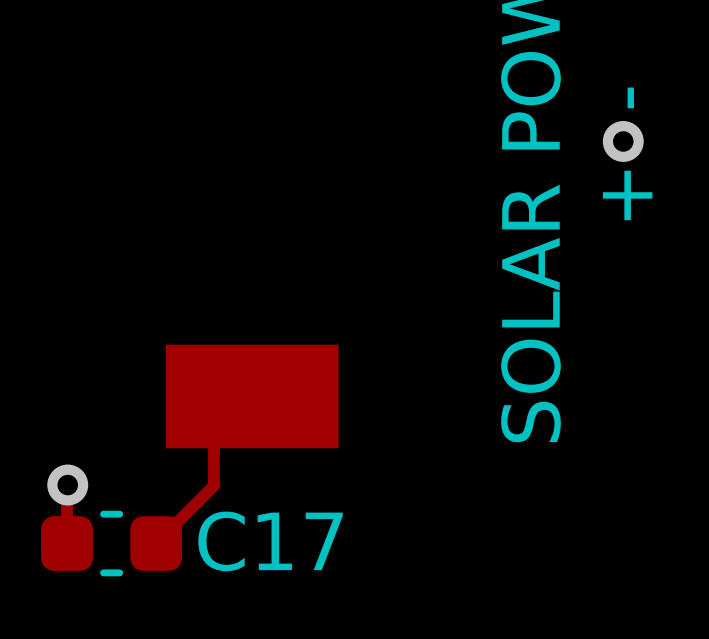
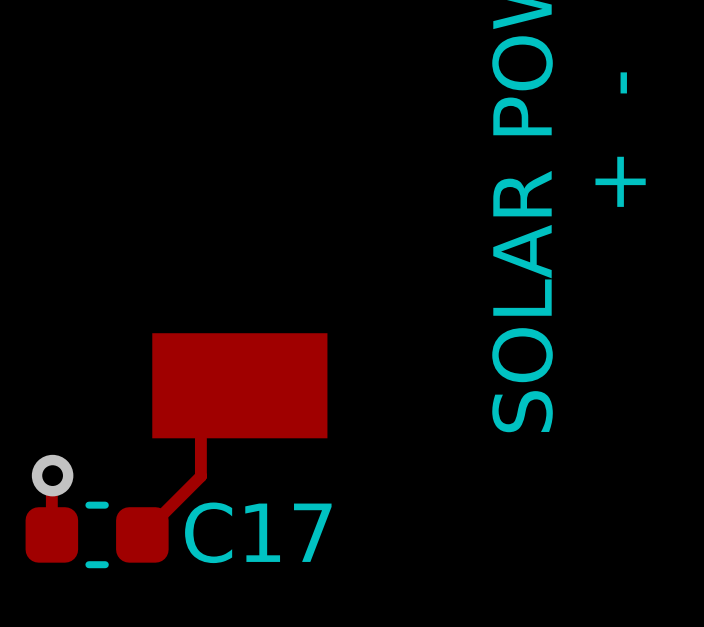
via: (623, 141) -> none

